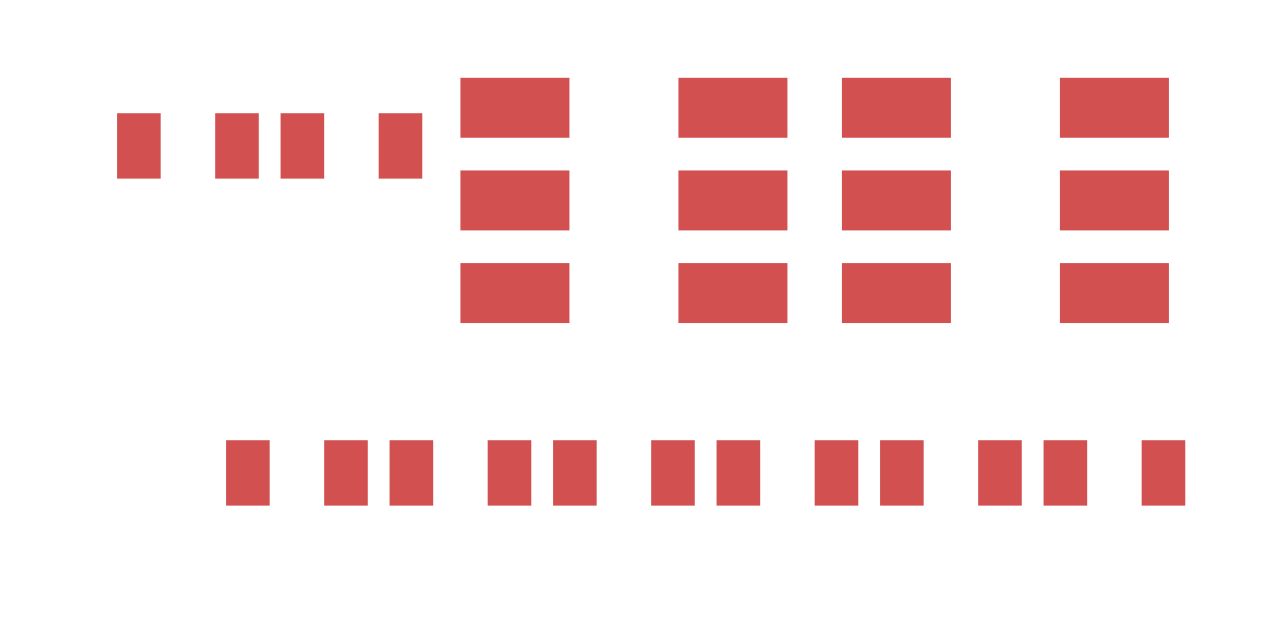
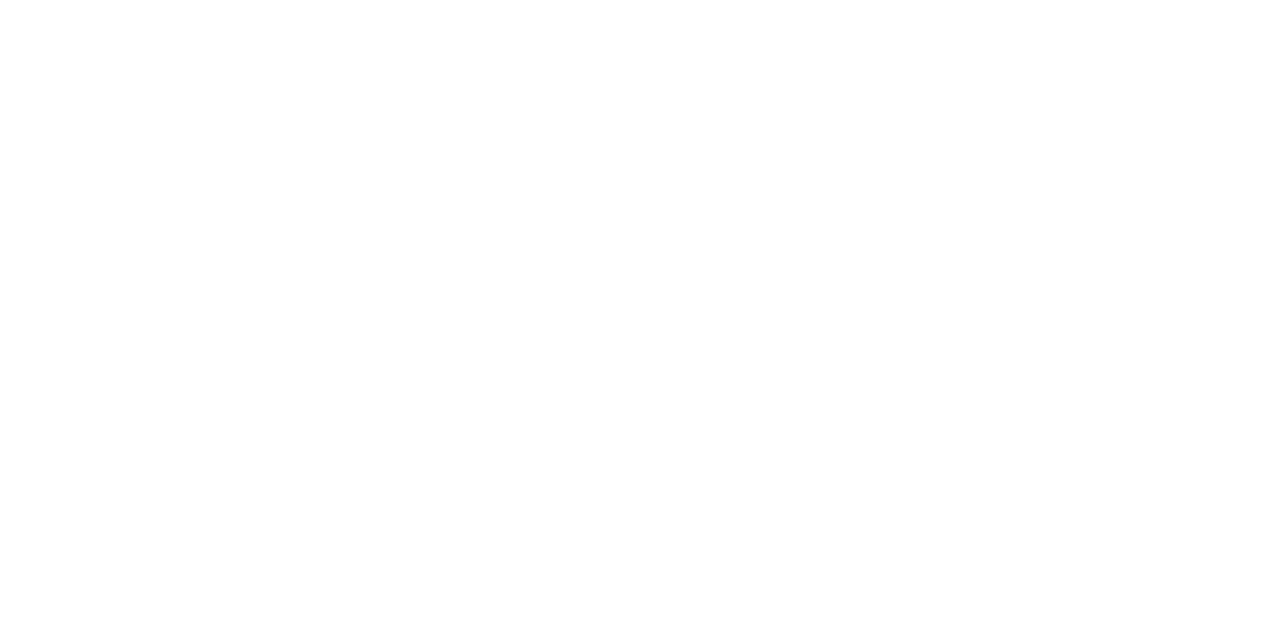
part: (187, 145) -> none
part: (351, 145) -> none
part: (623, 200) -> none
part: (1005, 200) -> none
part: (296, 472) -> none
part: (460, 472) -> none
part: (623, 472) -> none
part: (787, 472) -> none
part: (950, 472) -> none
part: (1114, 472) -> none

